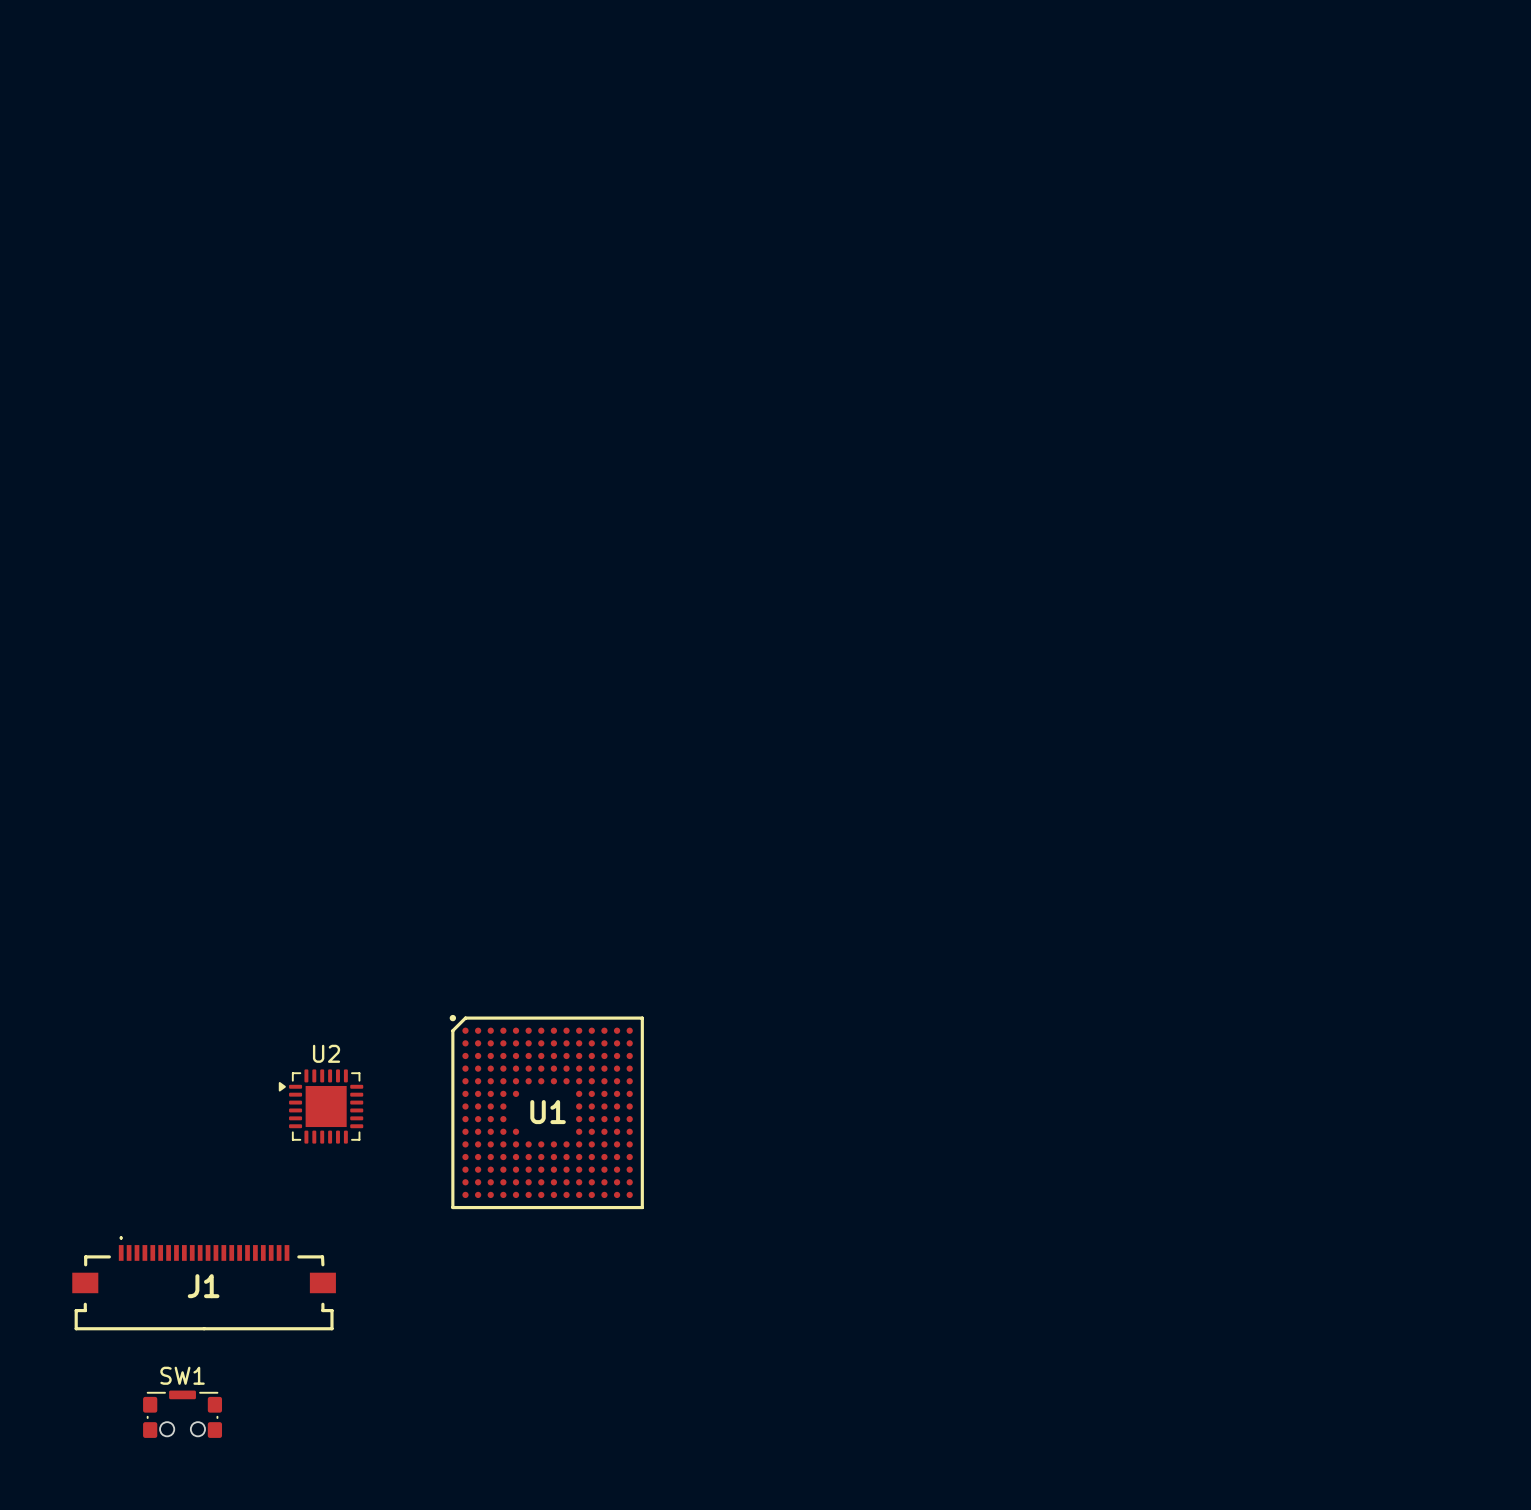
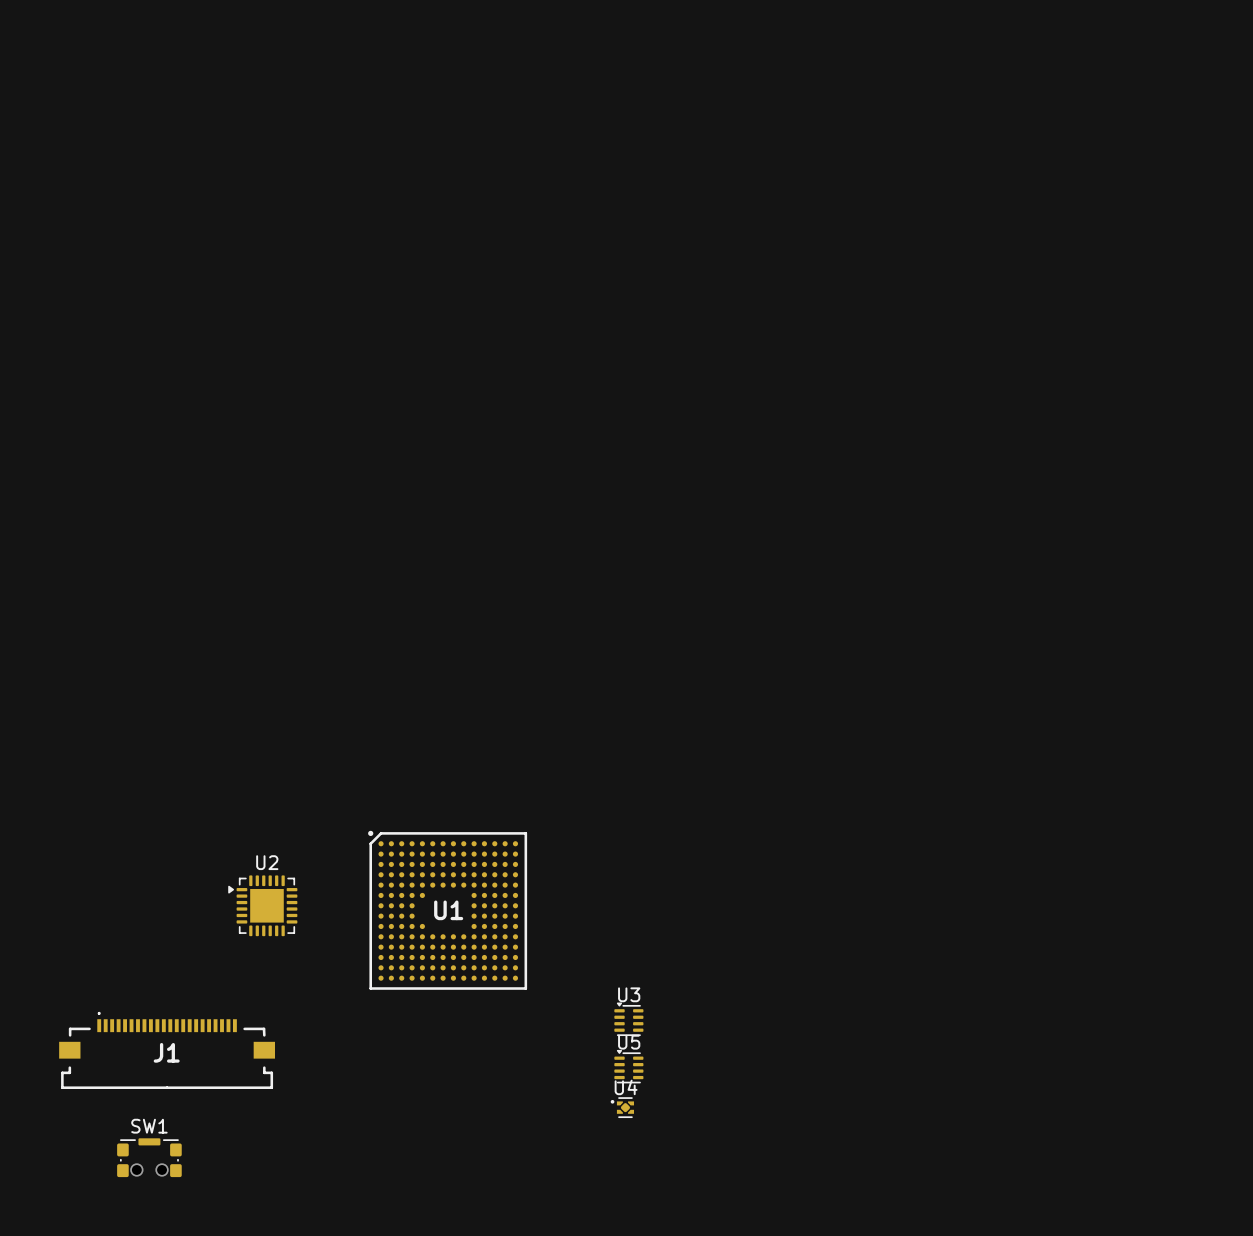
U3: none -> (628, 1019)
U5: none -> (628, 1066)
U4: none -> (622, 1107)

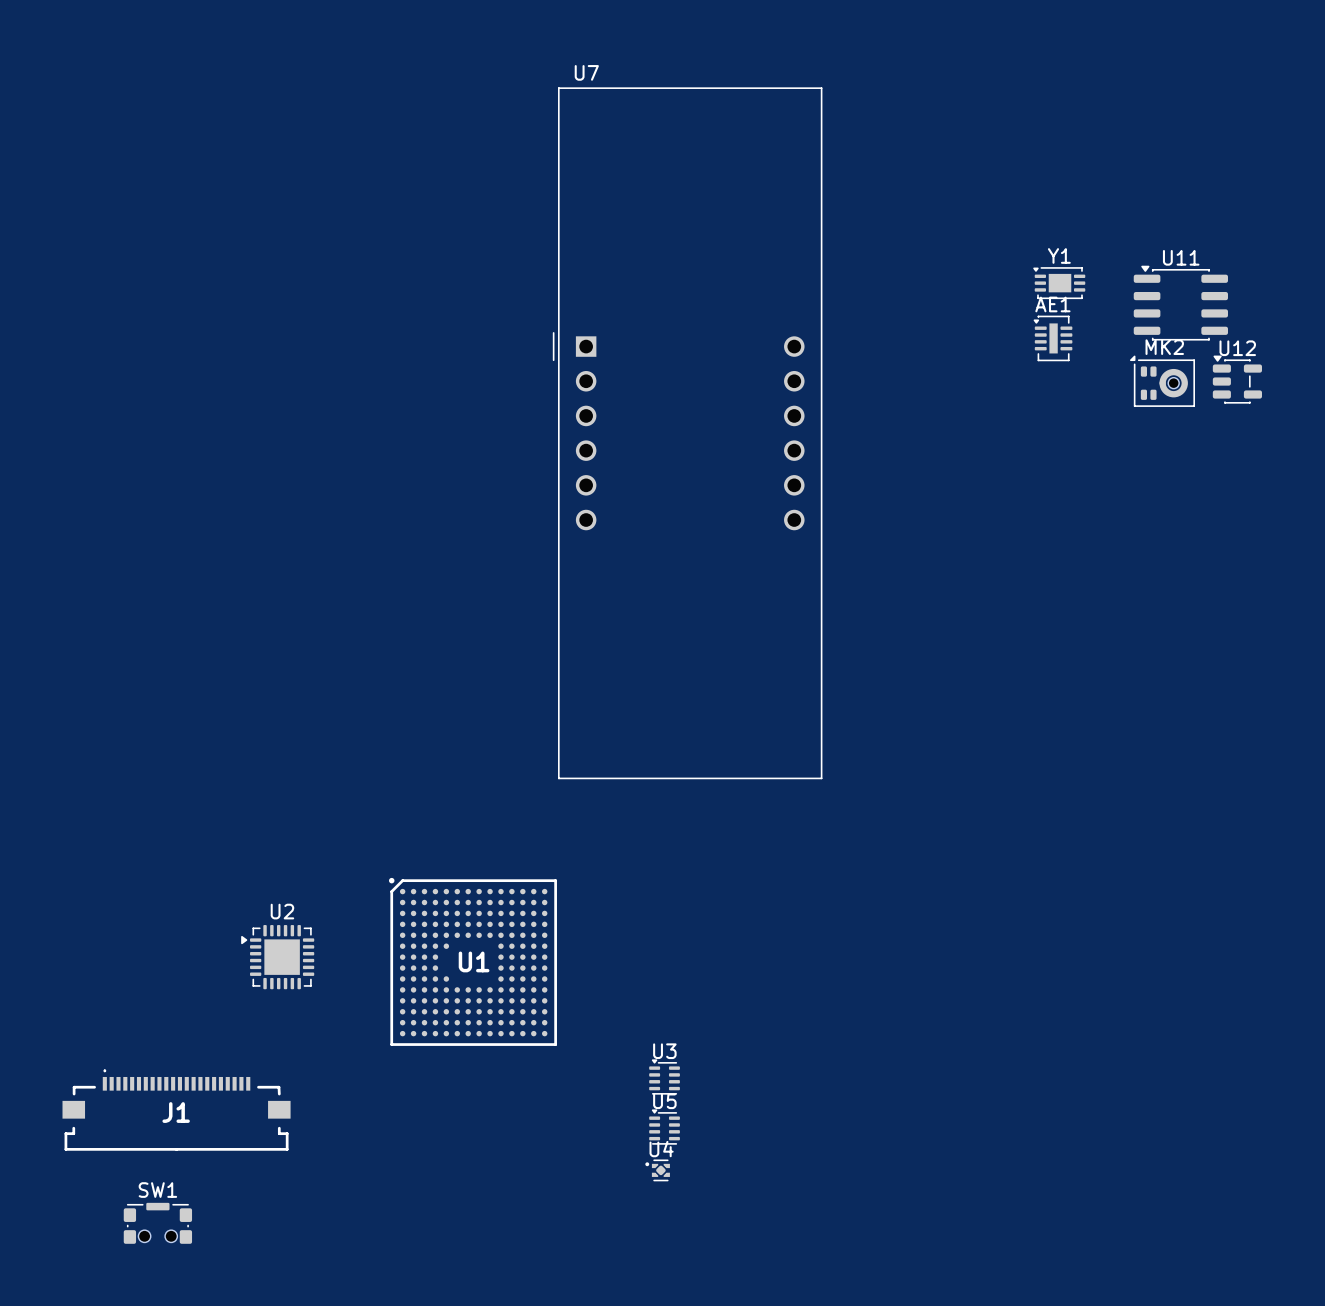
Y1: none -> (1059, 283)
U11: none -> (1180, 303)
AE1: none -> (1053, 338)
U12: none -> (1237, 379)
MK2: none -> (1162, 381)
U7: none -> (687, 433)

